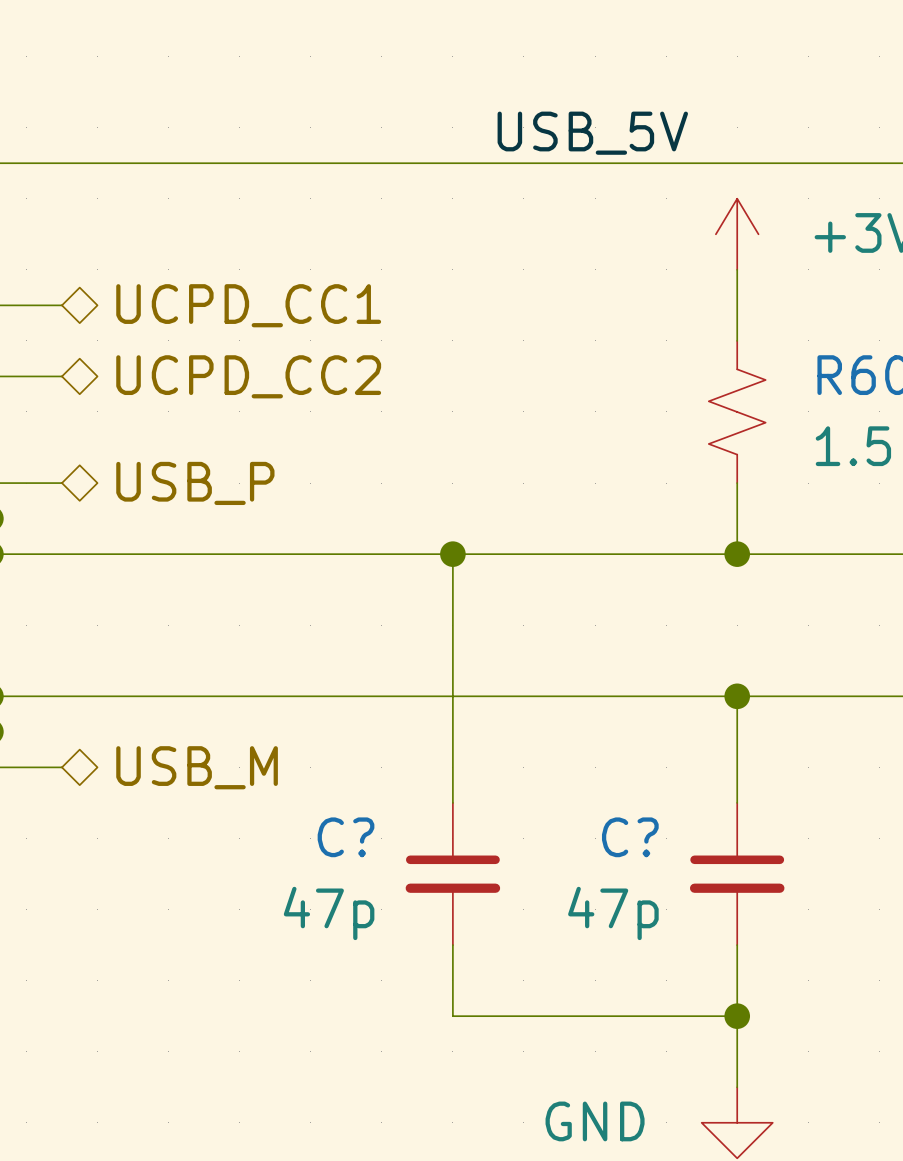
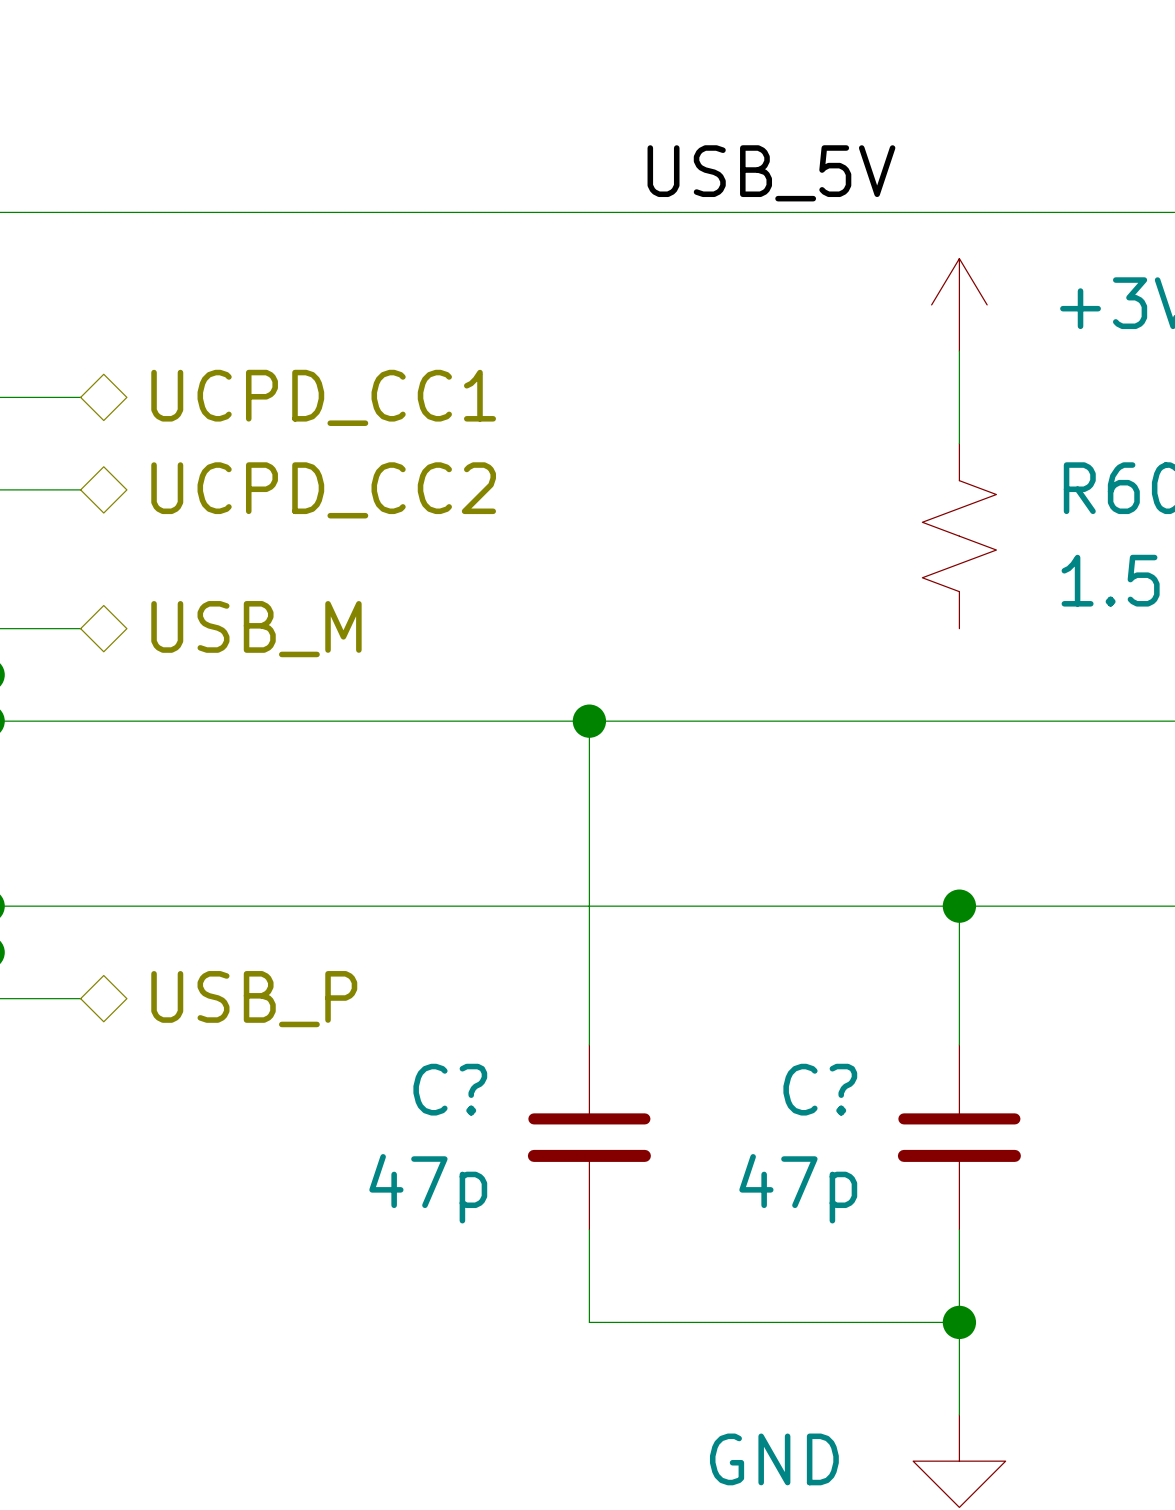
hierarchical label: USB_P (195, 483) -> USB_M (256, 629)
wire: (737, 483) (737, 554) -> none
junction: (737, 554) -> none
hierarchical label: USB_M (197, 767) -> USB_P (254, 999)

